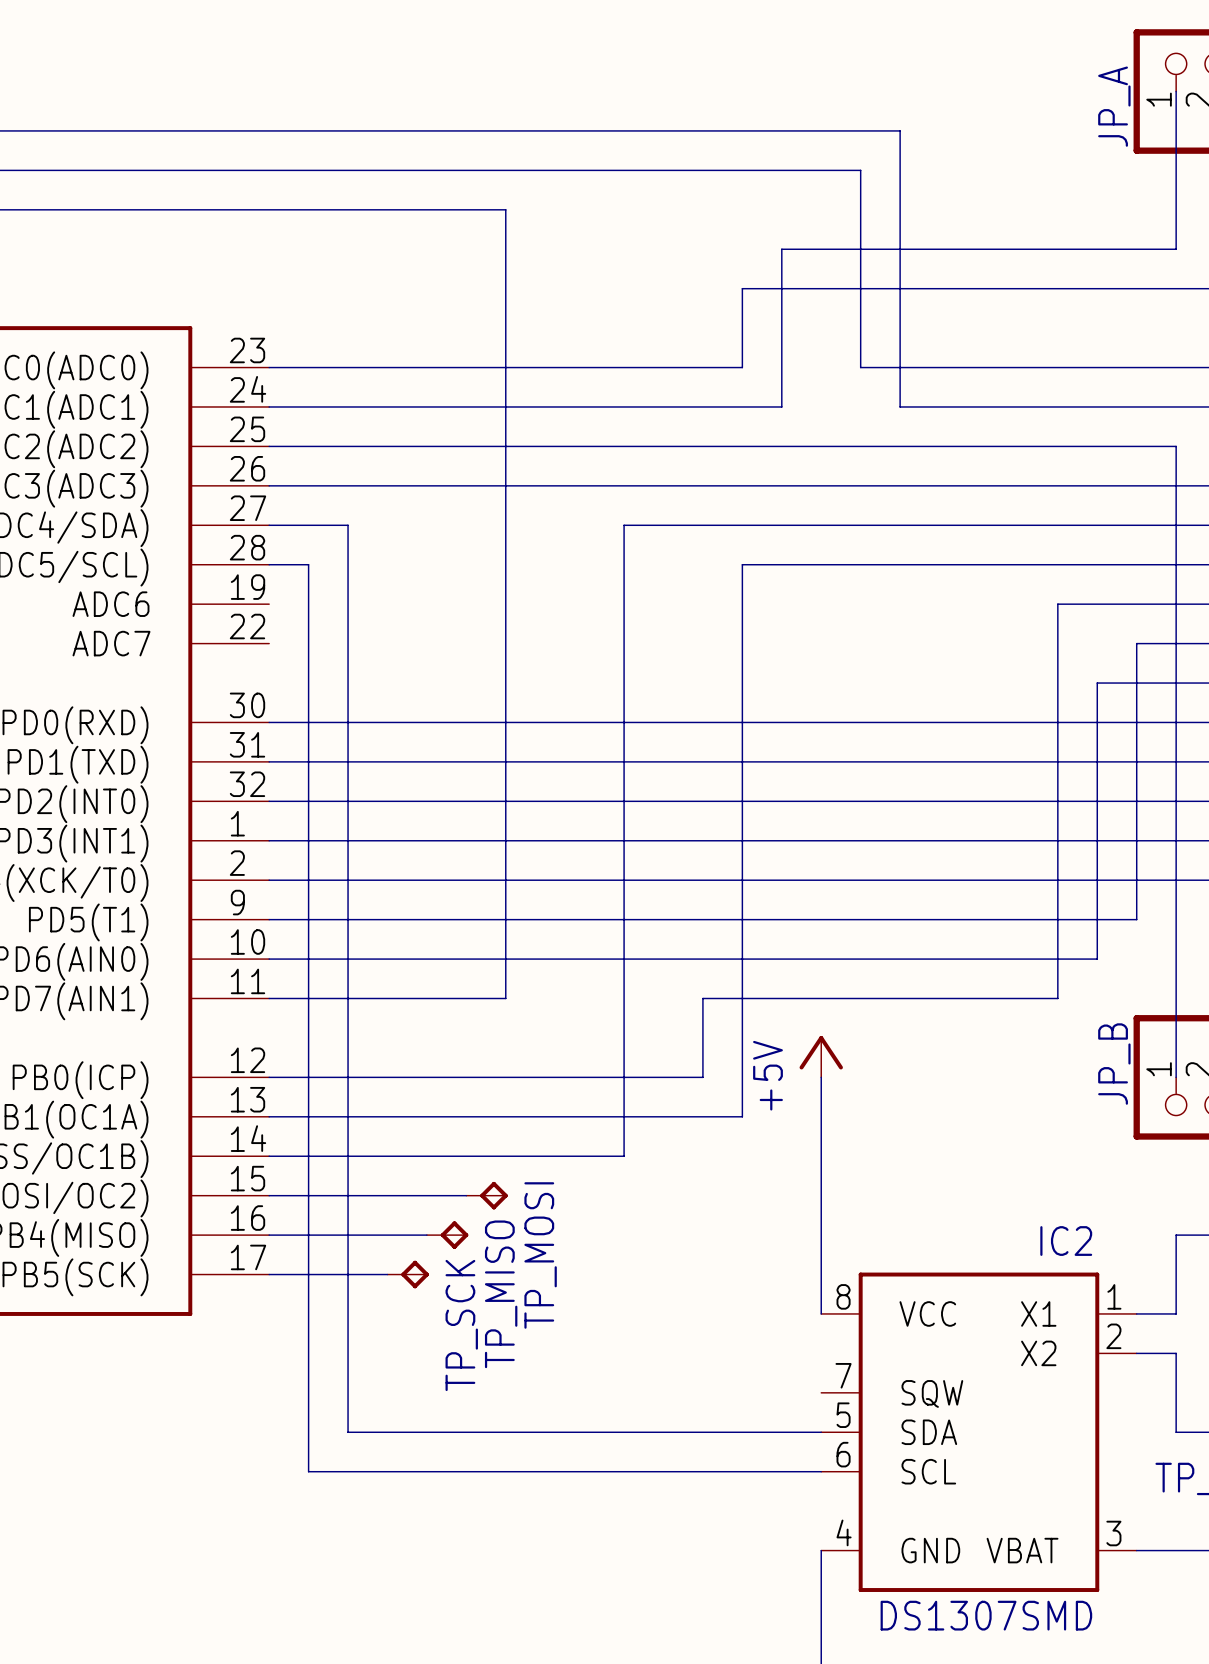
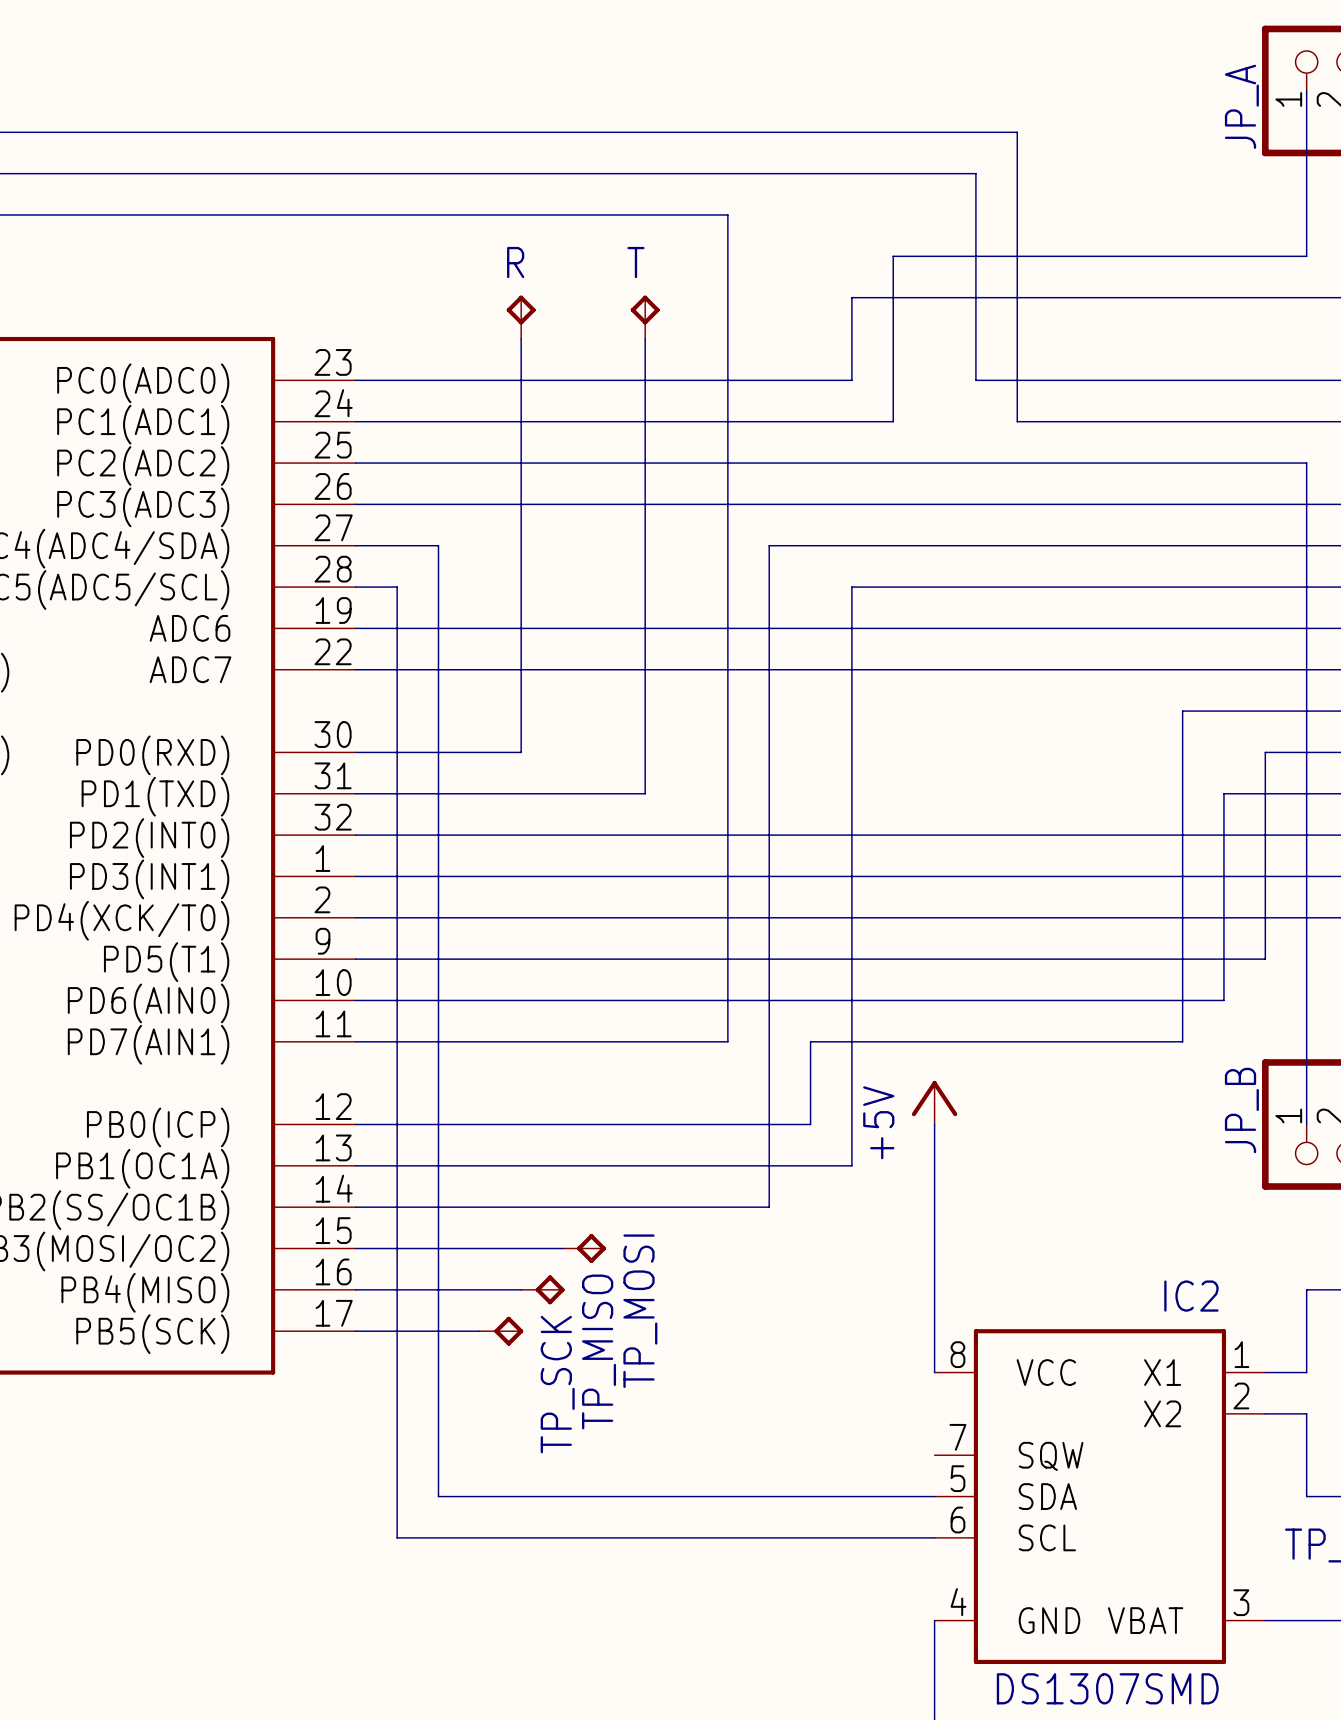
wire: (505, 209) (505, 998) -> none
R: none -> (521, 317)
T: none -> (645, 317)
wire: none -> (521, 339) (521, 752)
wire: (624, 525) (663, 525) -> (727, 545) (727, 214) (603, 214)
wire: none -> (769, 545) (769, 1207) (727, 1207)
wire: none -> (355, 628) (1182, 628)
wire: (1057, 604) (1057, 683) -> (1223, 711) (1182, 711)
wire: (1136, 643) (1136, 722) (426, 722) -> (1265, 669) (355, 669)
wire: (1097, 683) (1097, 761) (545, 761) -> (645, 339) (645, 793)
wire: (624, 998) (624, 1156) -> (727, 1041) (603, 1041)

